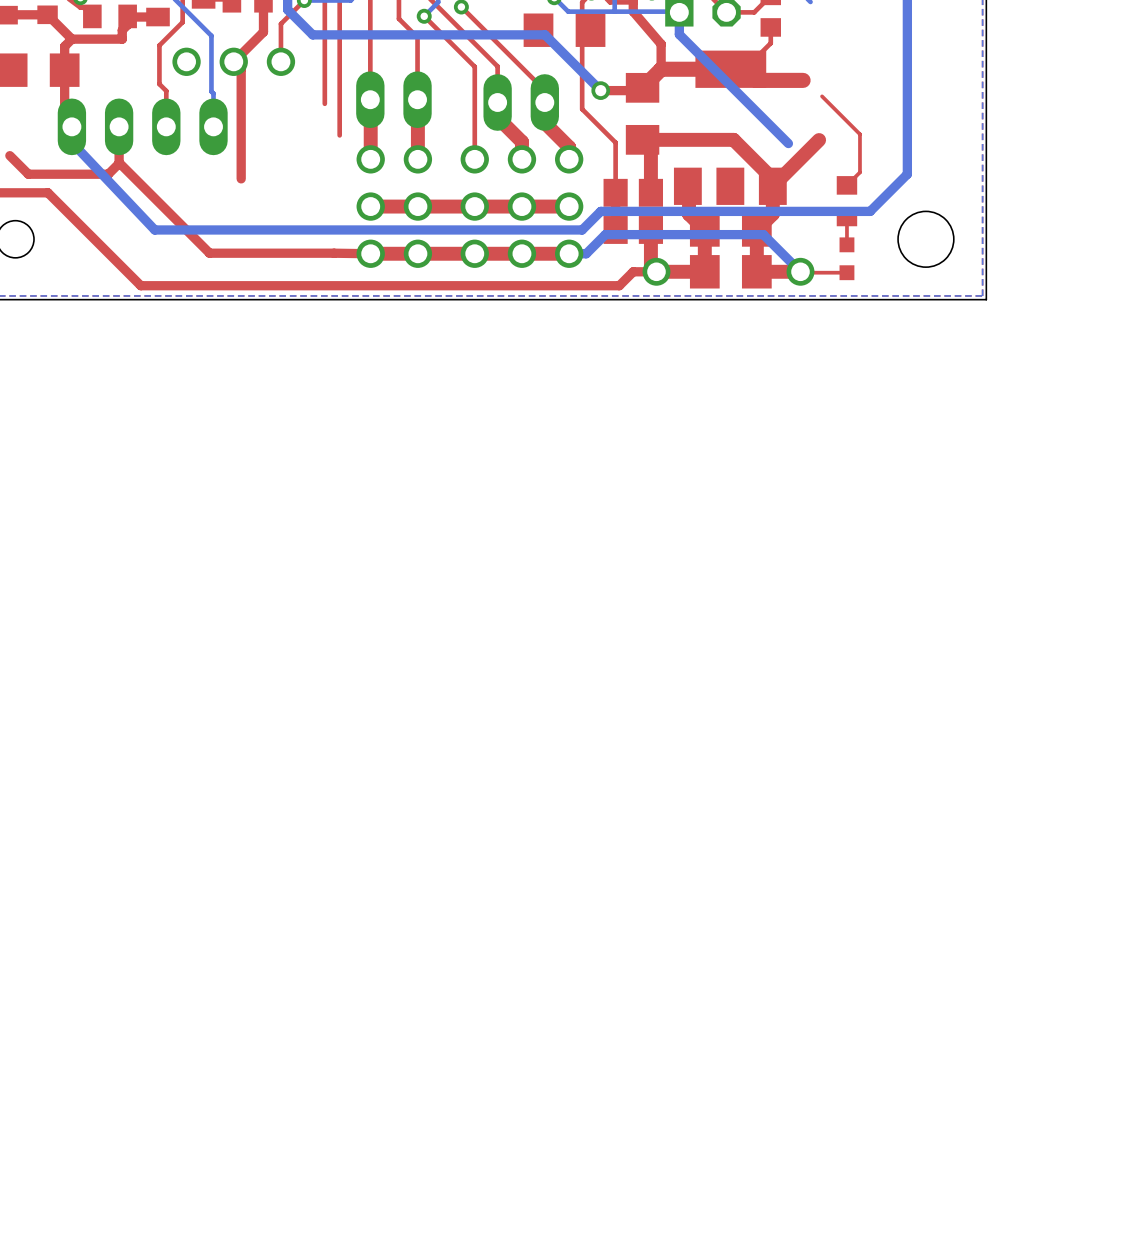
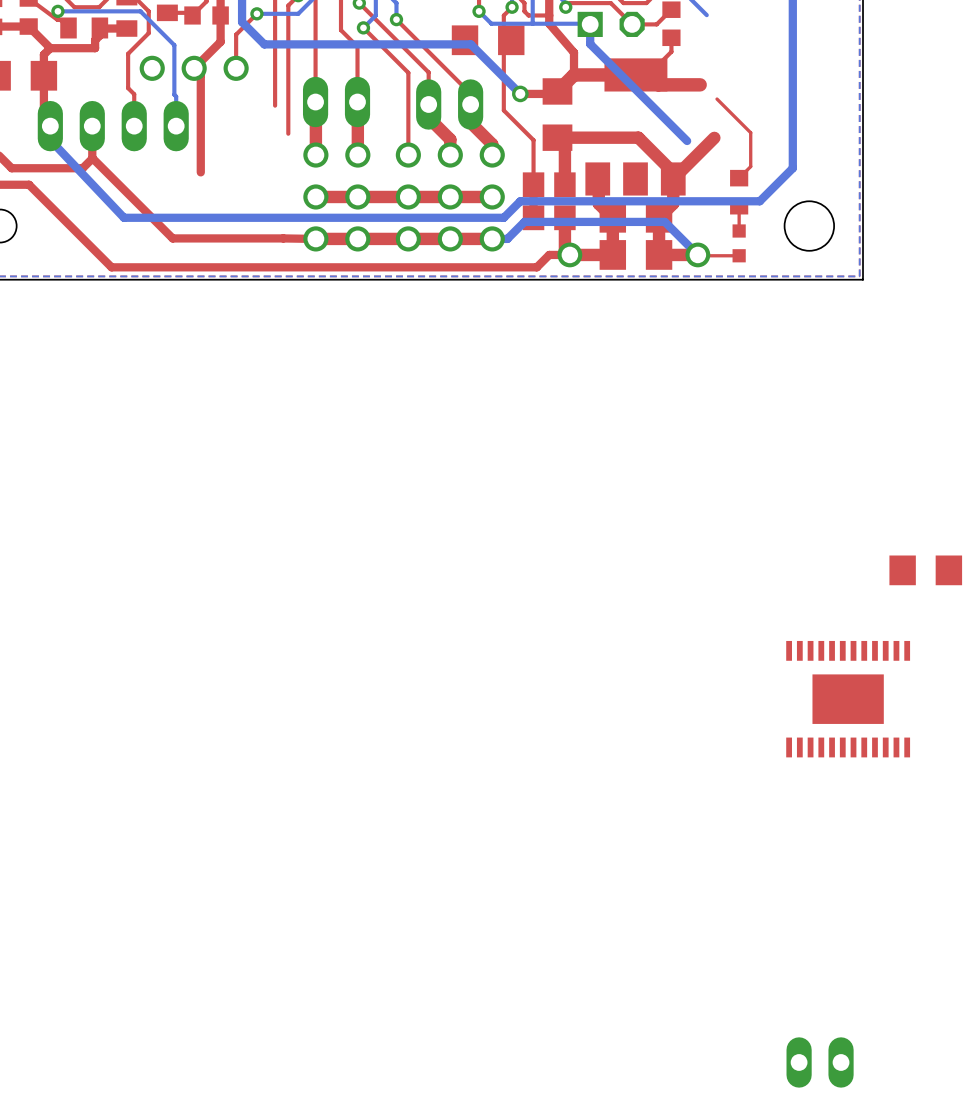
part: none -> (925, 570)
part: none -> (848, 699)
part: none -> (820, 1062)

